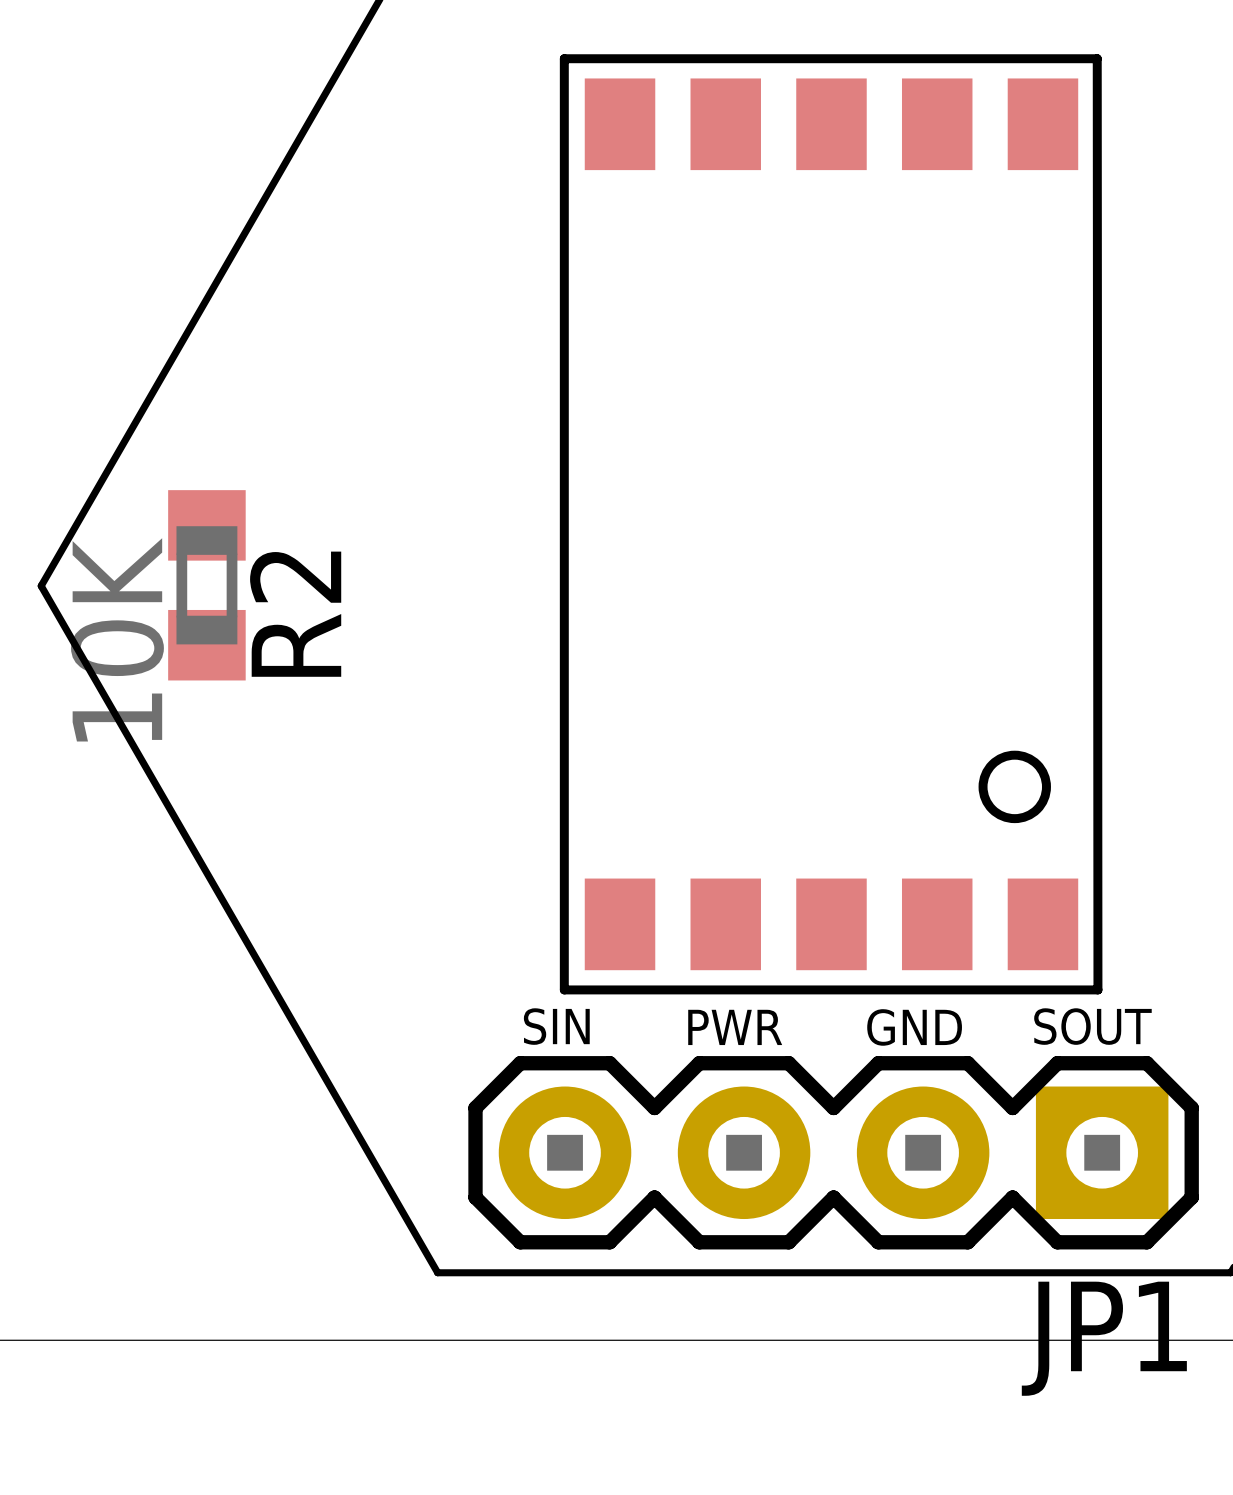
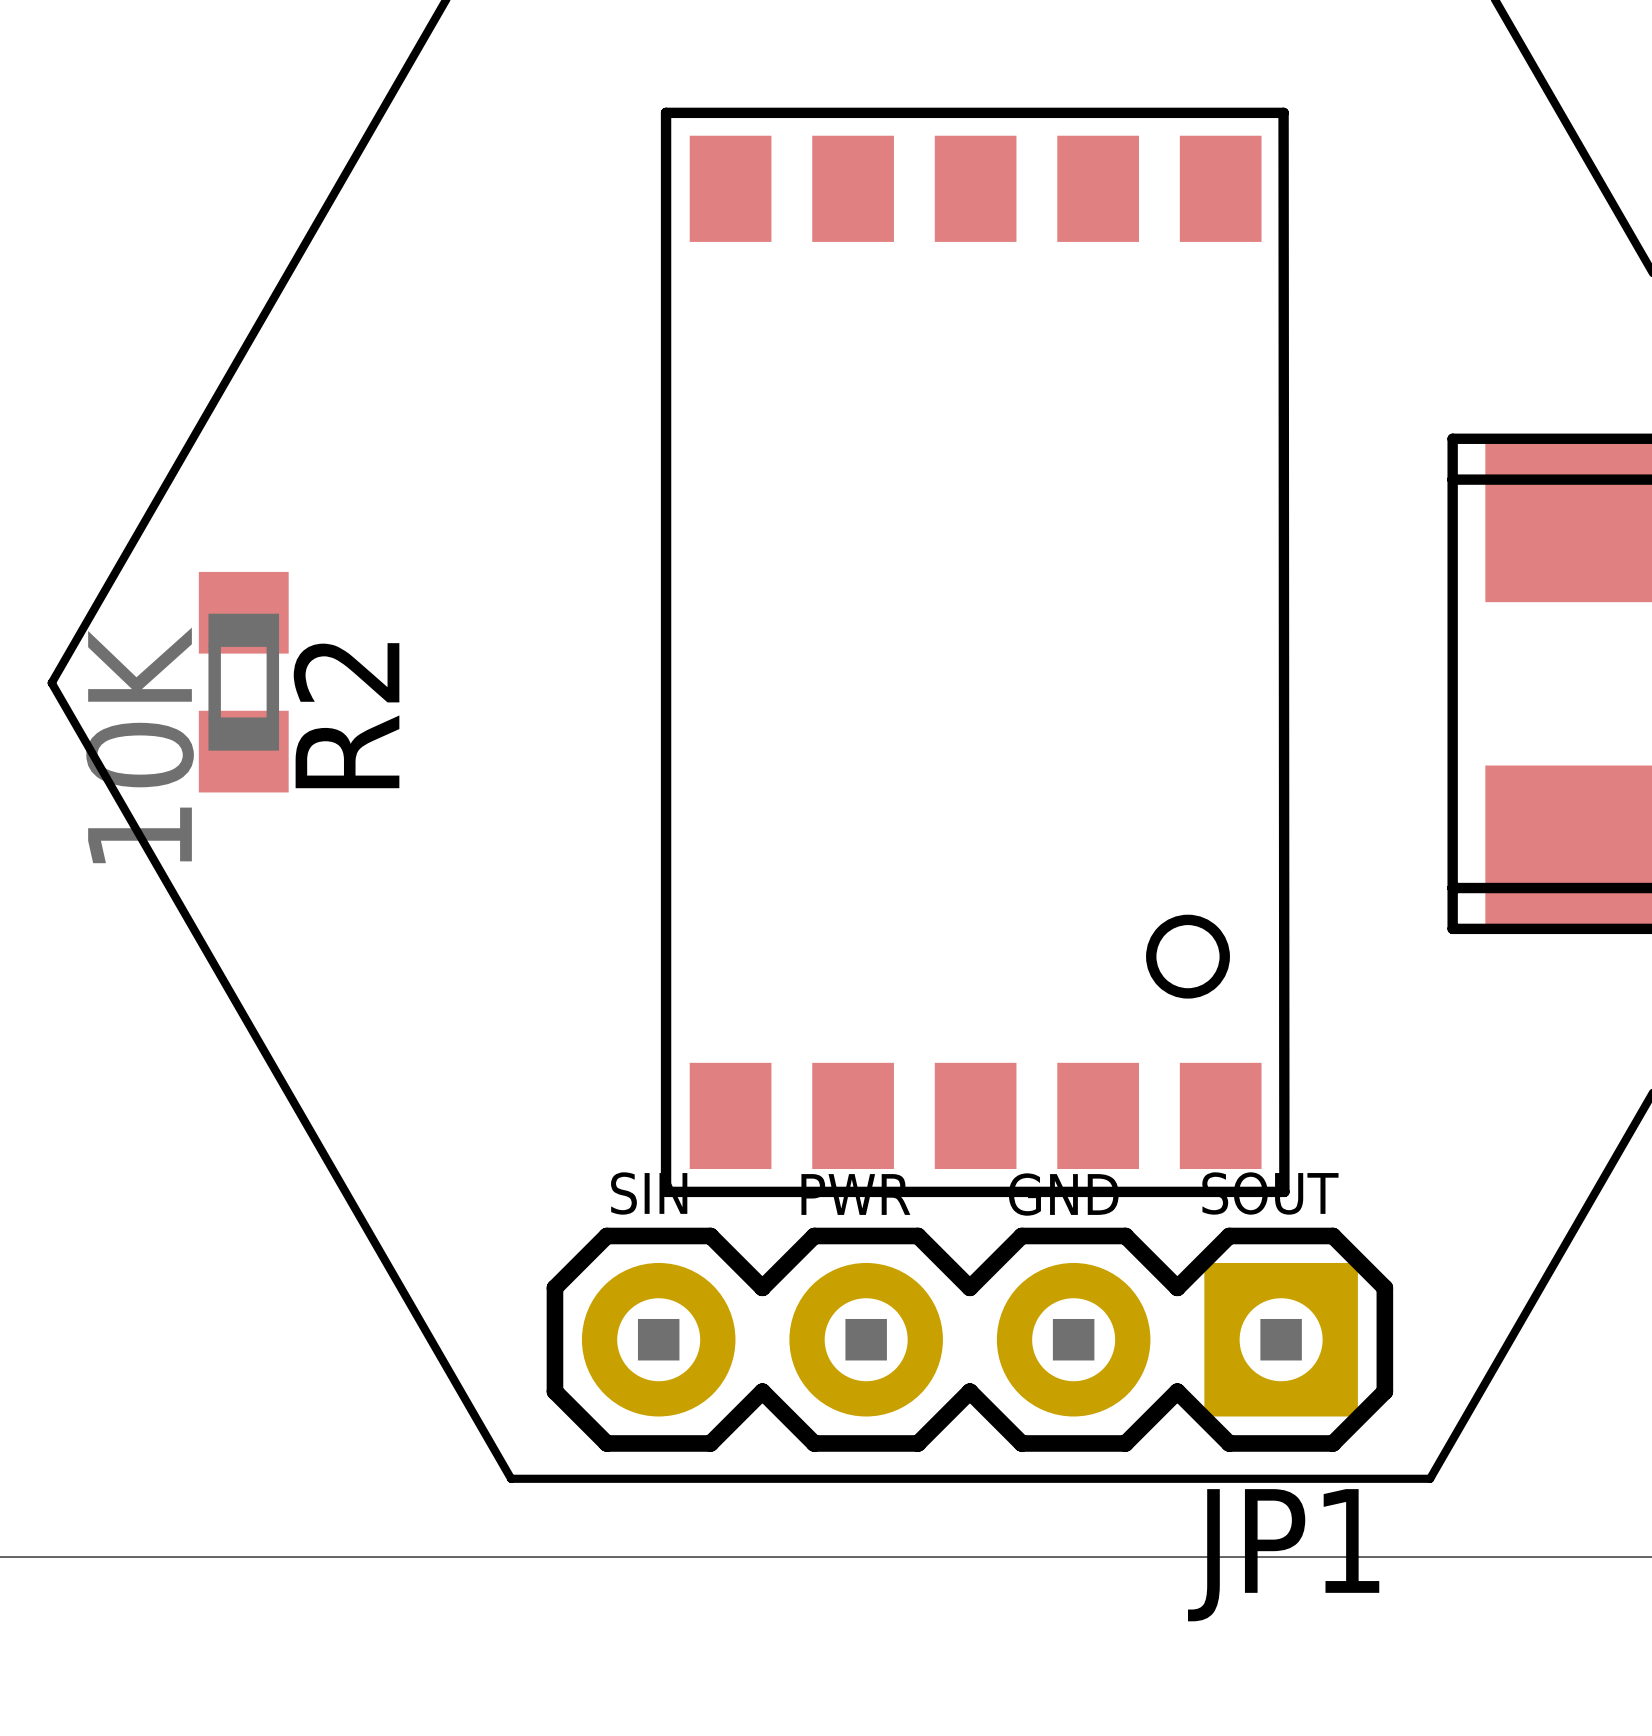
part position: (831, 524) -> (975, 652)

